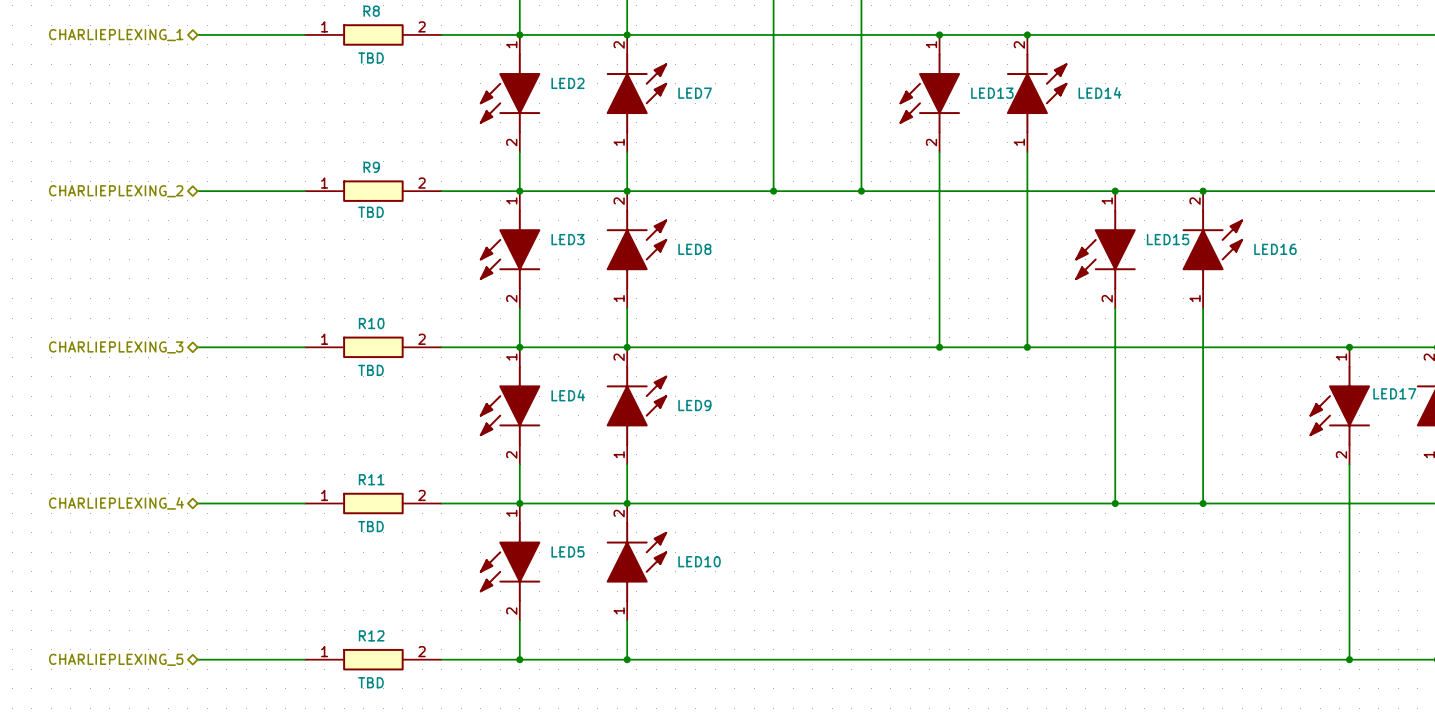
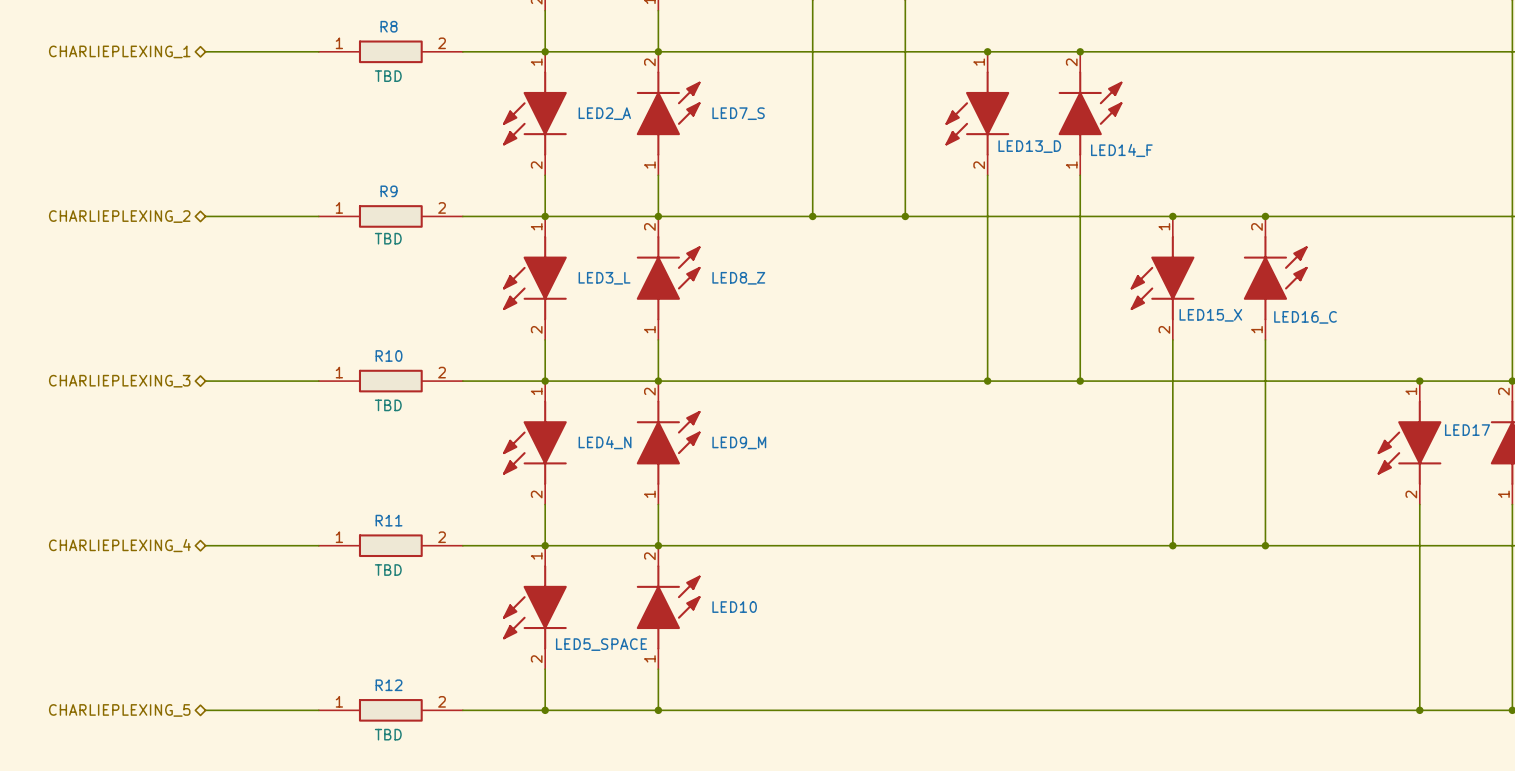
LED2 name: LED2 (567, 83) -> LED2_A (604, 113)
LED14 name: LED14 (1099, 92) -> LED14_F (1121, 150)
LED7 name: LED7 (695, 93) -> LED7_S (738, 113)
LED13 name: LED13 (992, 93) -> LED13_D (1029, 146)
LED3 name: LED3 (567, 239) -> LED3_L (604, 278)
LED15 name: LED15 (1168, 239) -> LED15_X (1210, 315)
LED8 name: LED8 (694, 249) -> LED8_Z (738, 278)
LED16 name: LED16 (1275, 249) -> LED16_C (1305, 317)
LED4 name: LED4 (568, 395) -> LED4_N (605, 442)
LED9 name: LED9 (694, 405) -> LED9_M (739, 442)
LED5 name: LED5 (567, 551) -> LED5_SPACE (601, 644)

